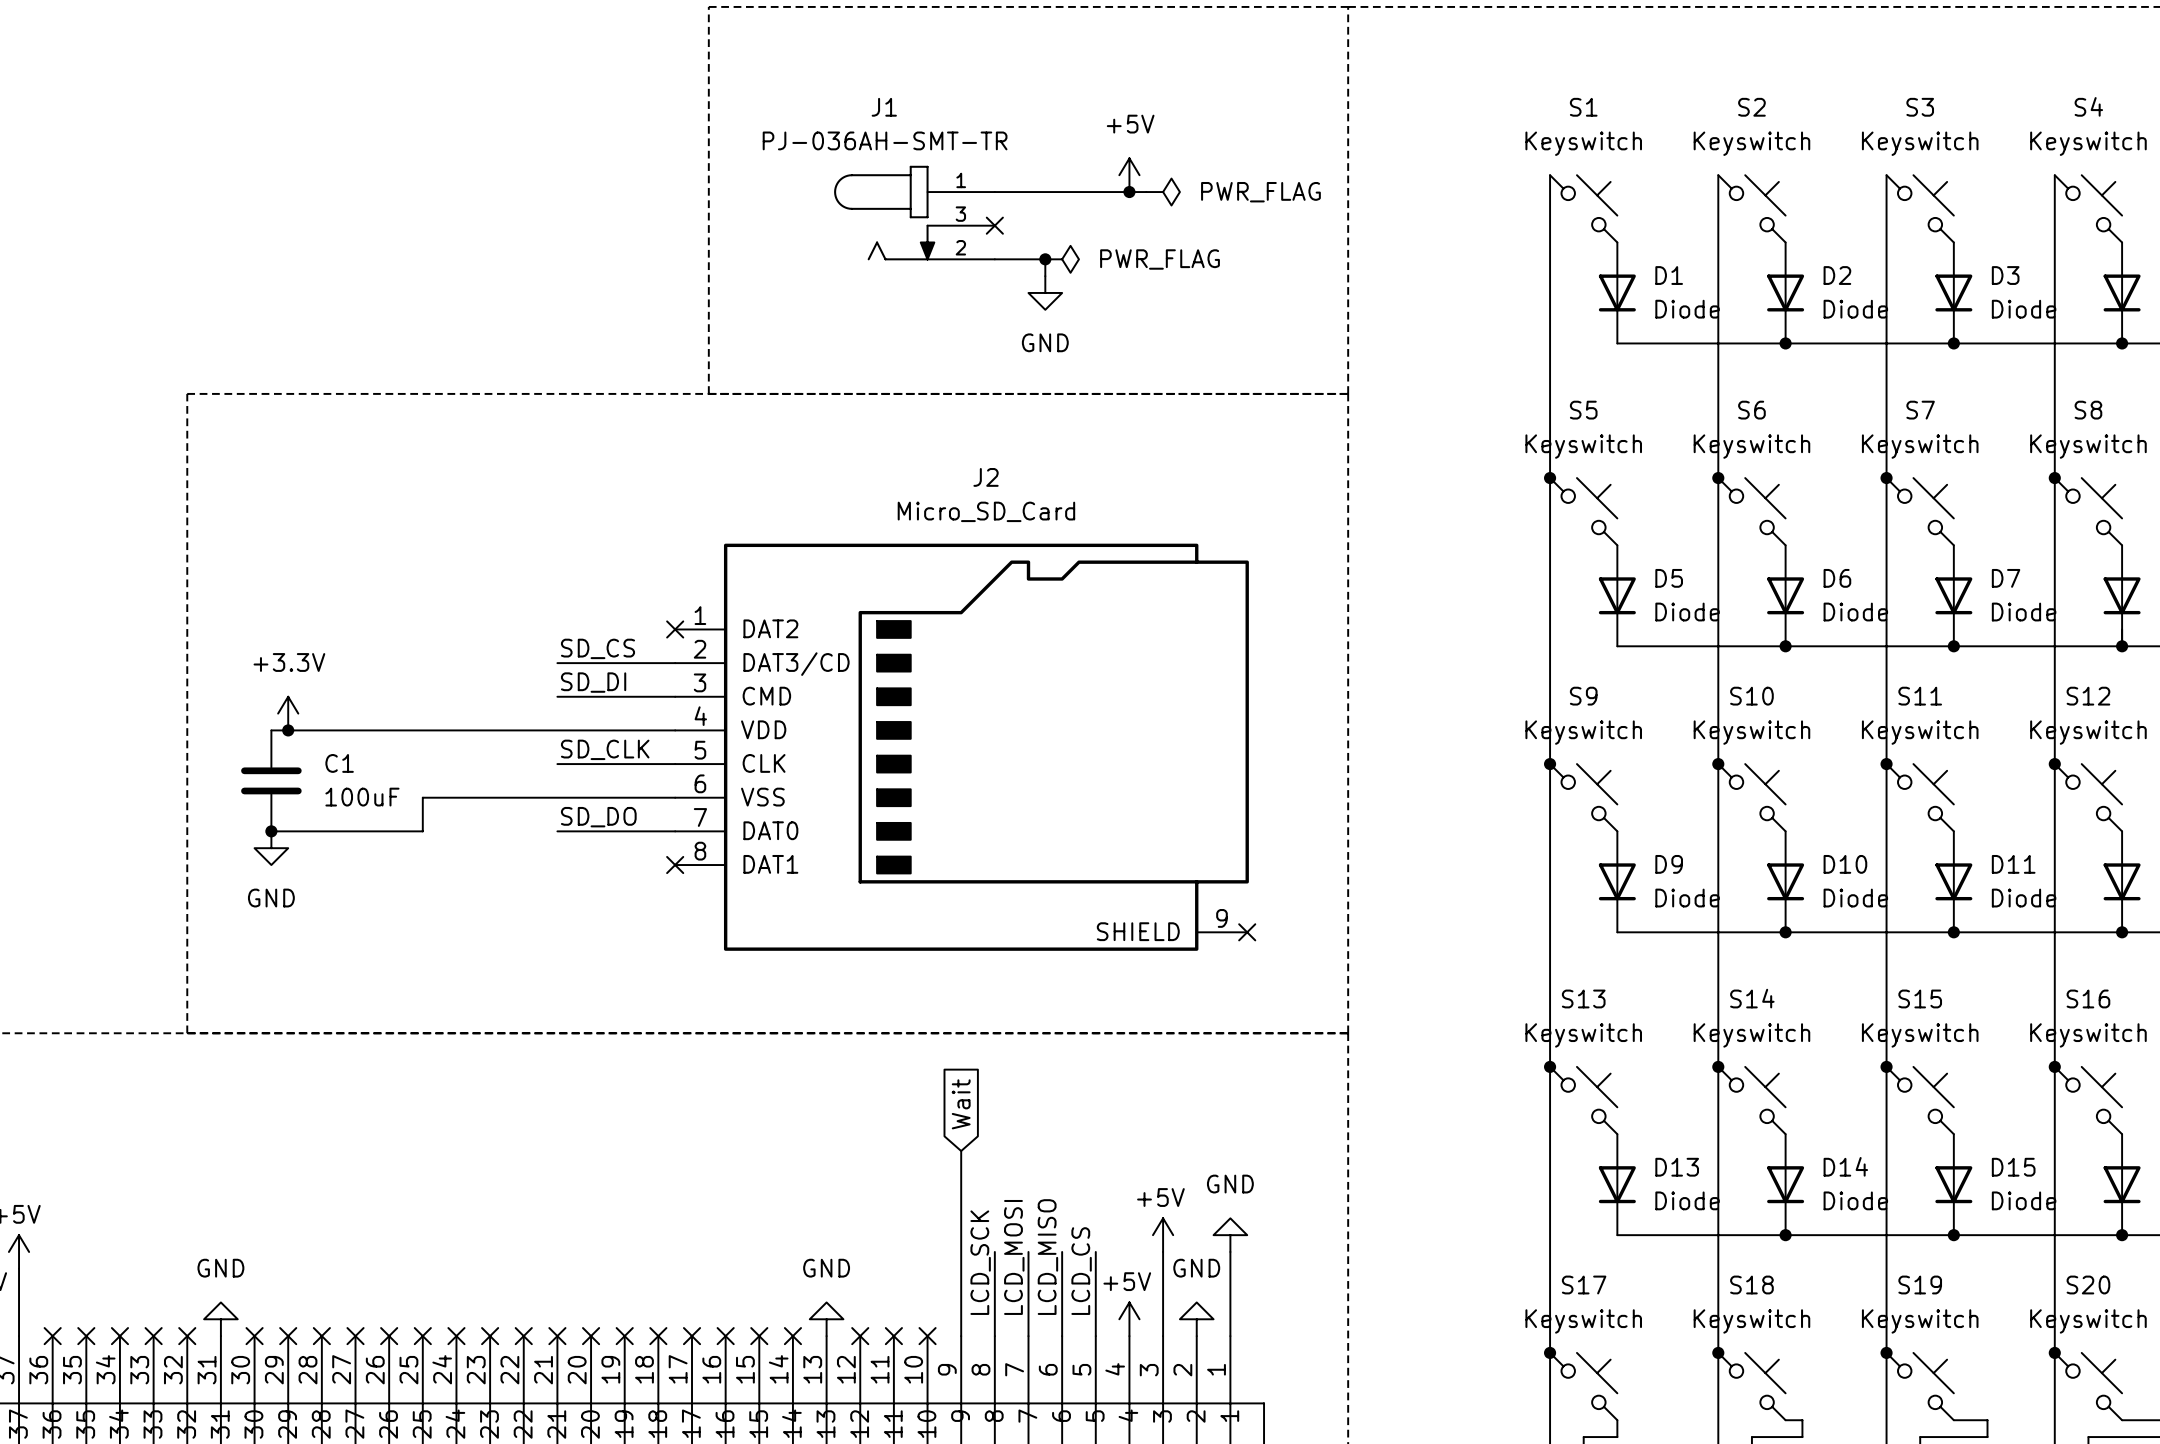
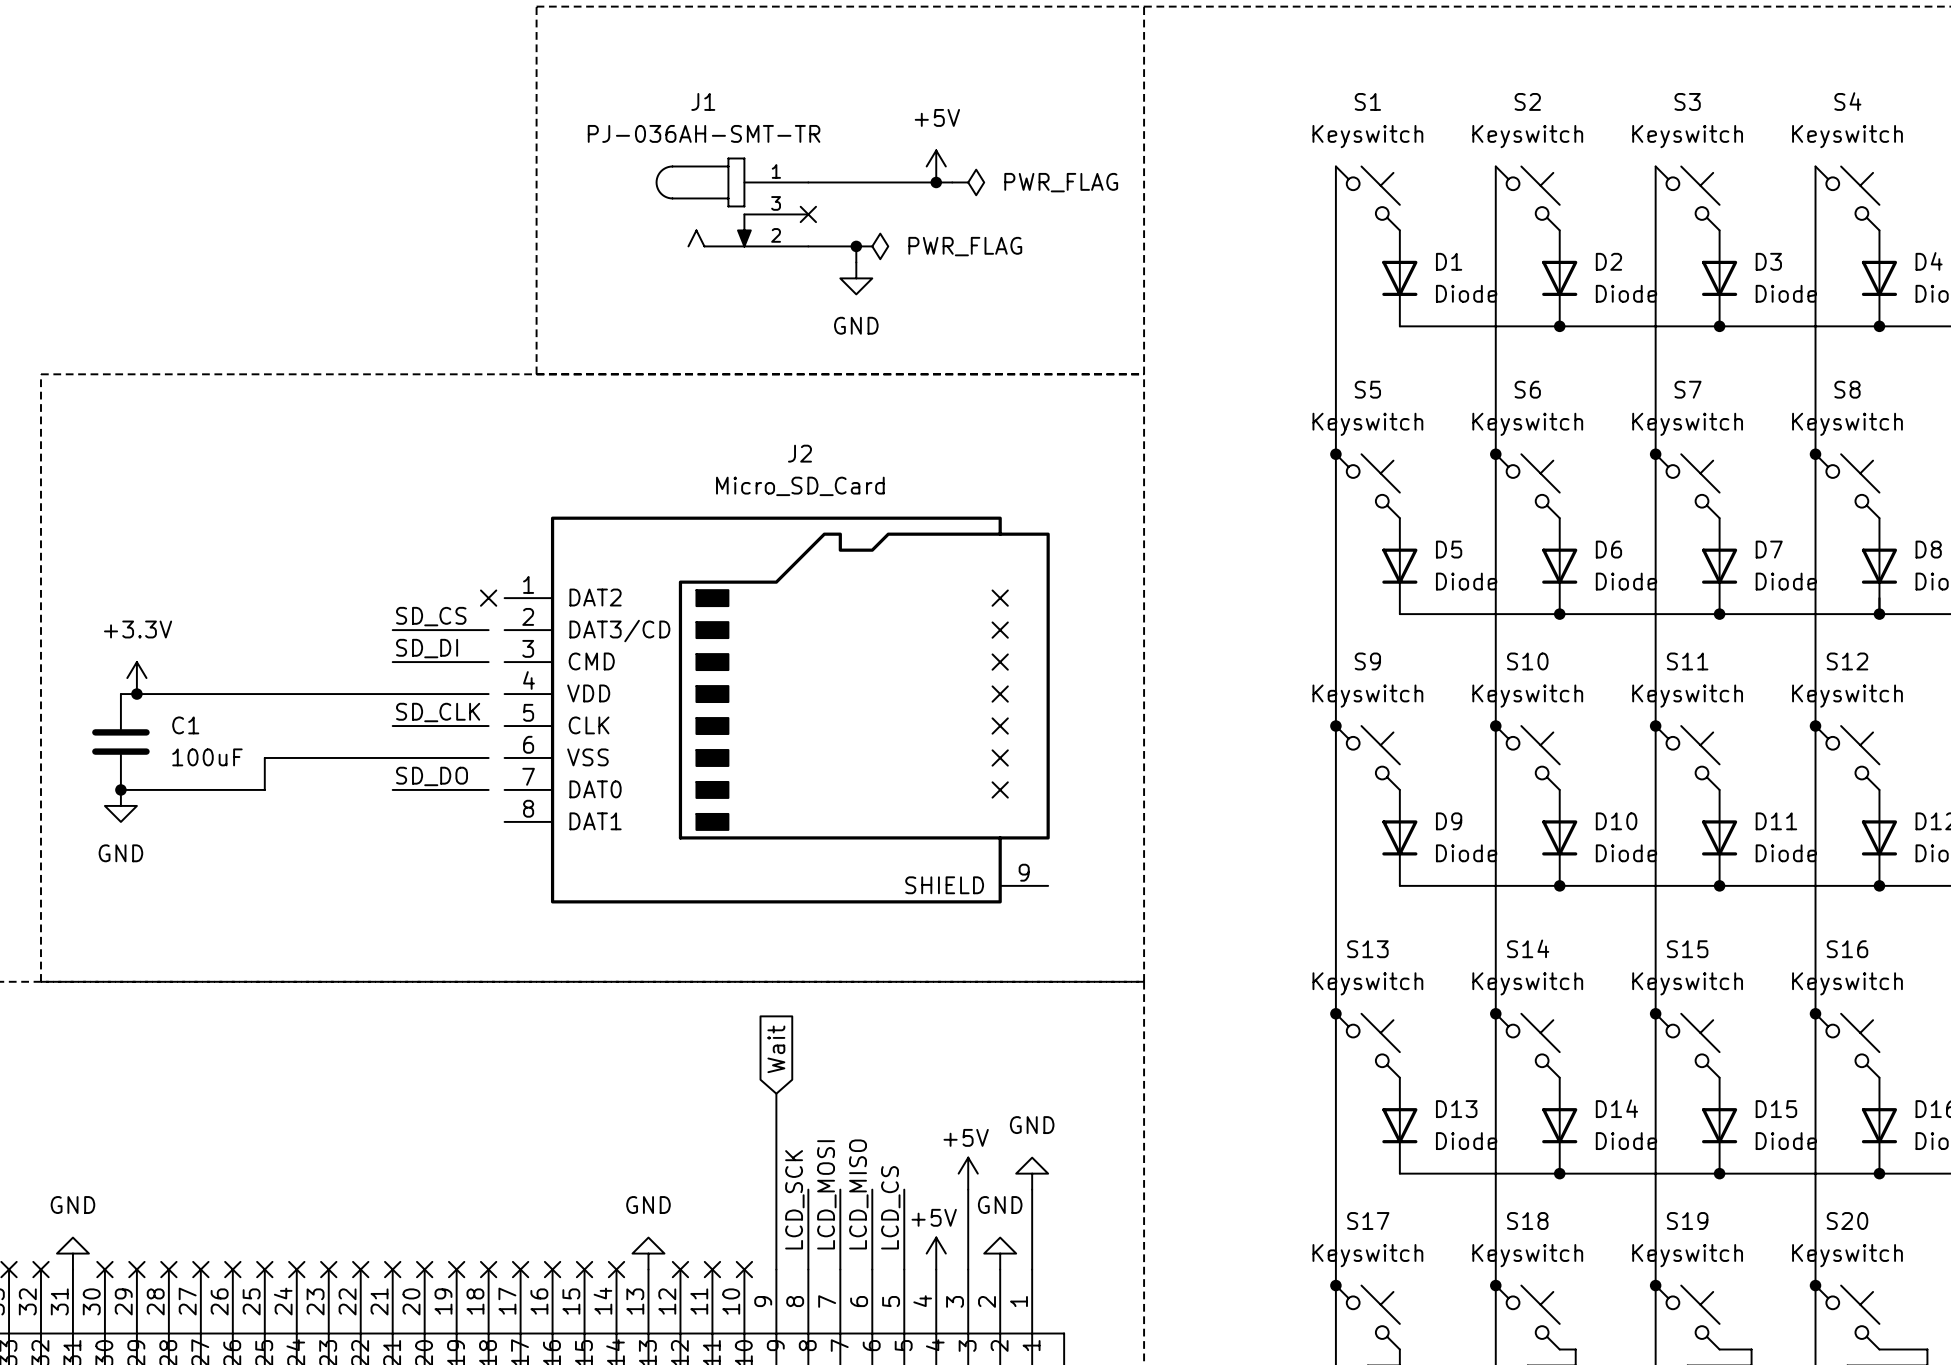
no-connect mark position: (675, 629) -> (488, 598)
no-connect mark: none -> (1000, 598)
wire: (658, 663) (675, 663) -> none
no-connect mark: none -> (1000, 630)
wire: (658, 696) (675, 696) -> none
no-connect mark: none -> (1000, 662)
wire: (658, 730) (675, 730) -> none
no-connect mark: none -> (1000, 694)
wire: (658, 764) (675, 764) -> none
no-connect mark: none -> (1000, 726)
wire: (658, 797) (675, 797) -> none
no-connect mark: none -> (1000, 757)
wire: (658, 831) (675, 831) -> none
no-connect mark: none -> (1000, 789)
no-connect mark: (675, 865) -> none
no-connect mark: (1247, 932) -> none

